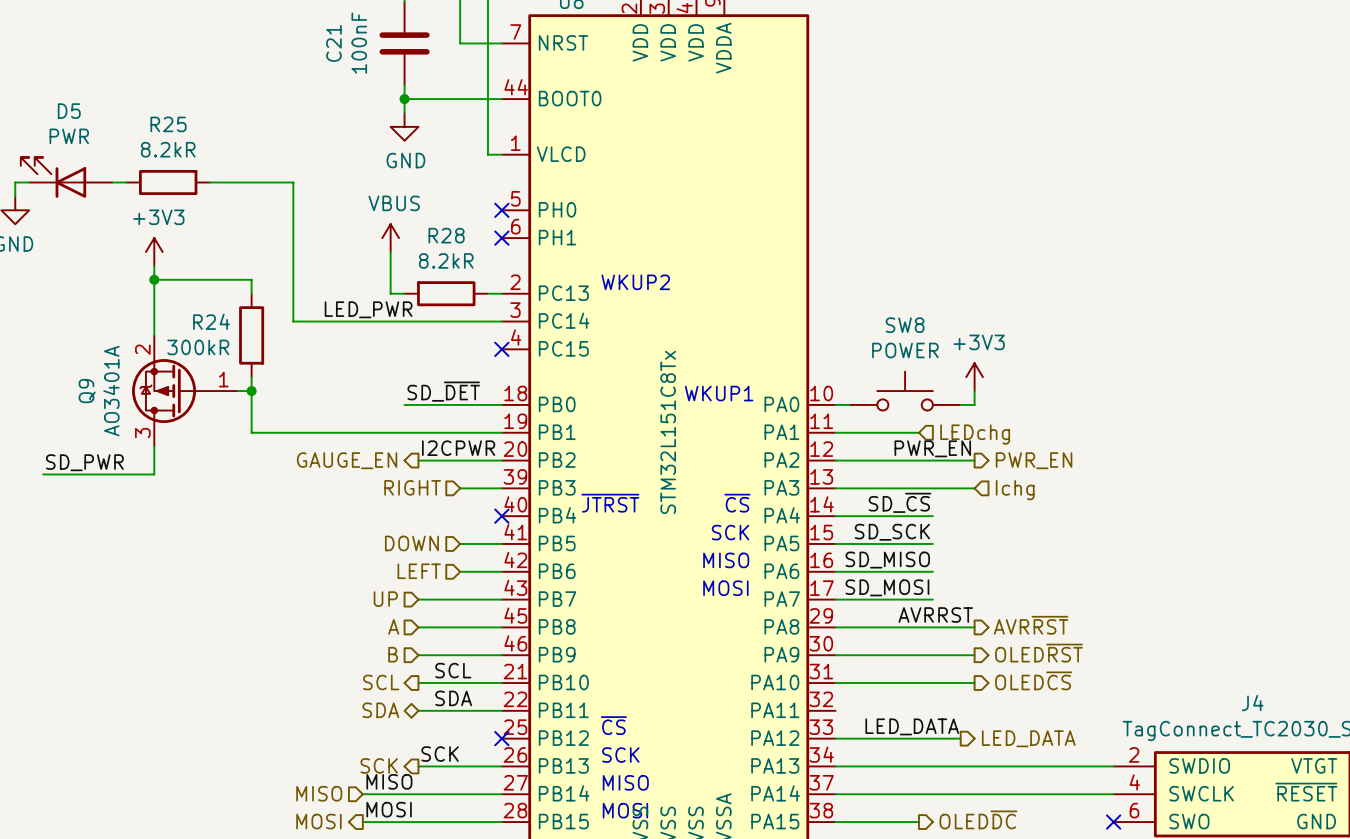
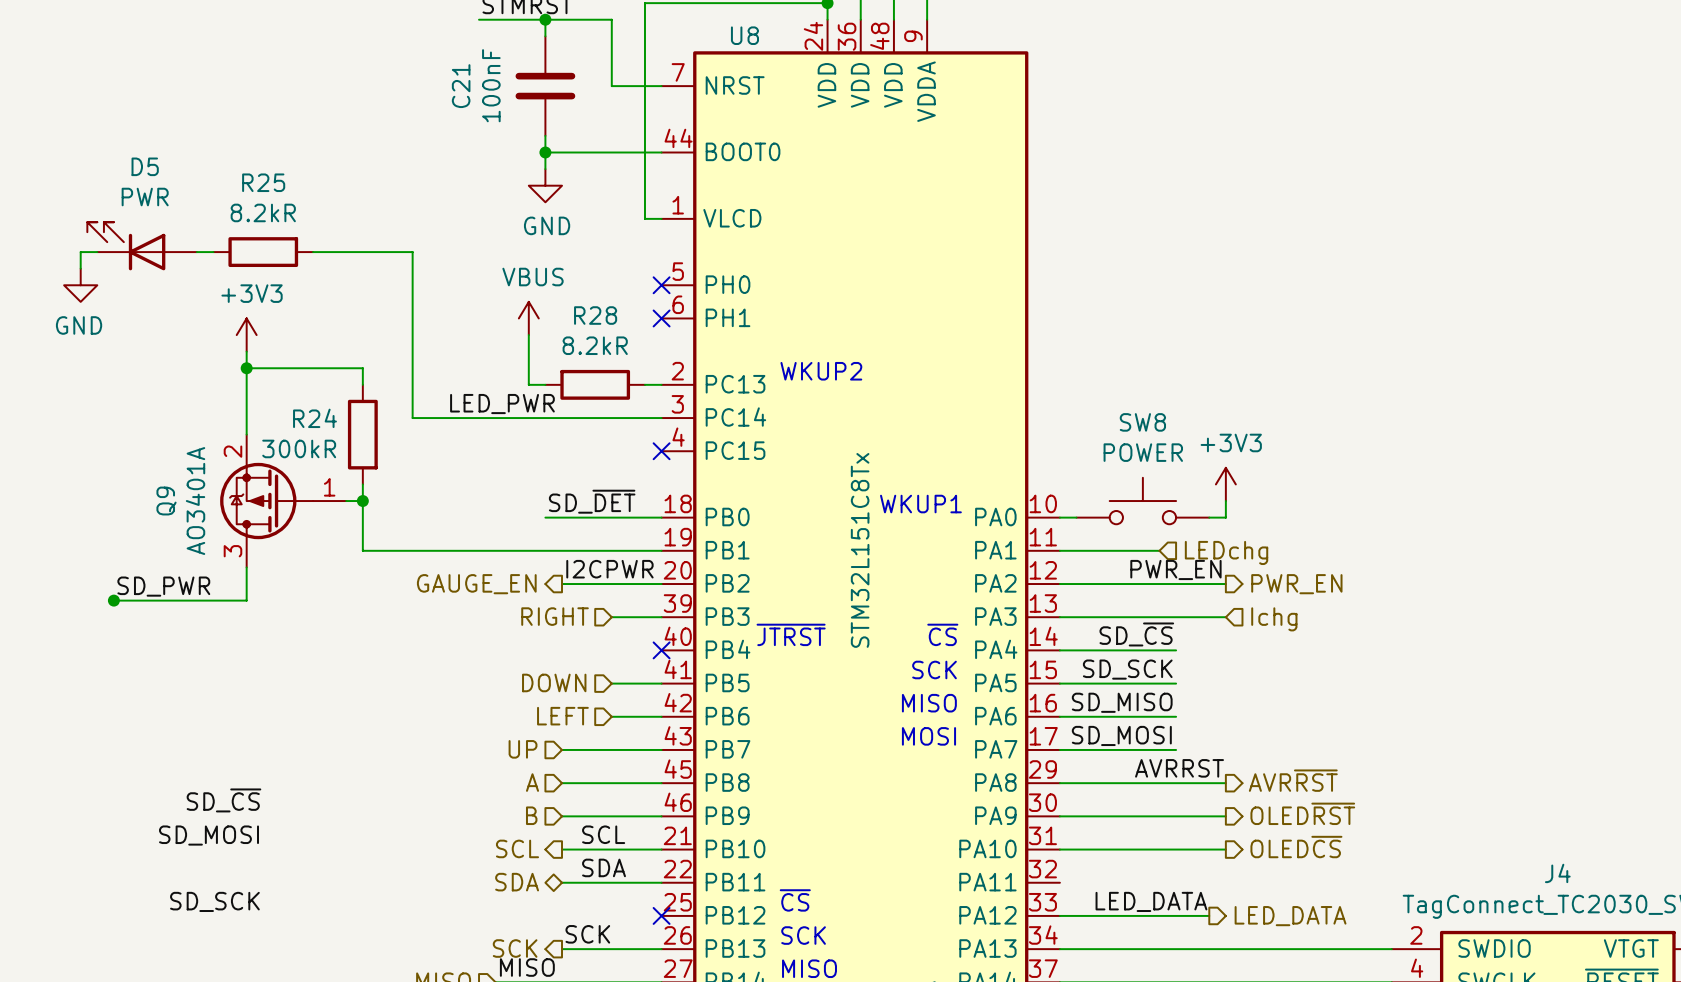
junction: none -> (113, 600)
label: none -> SD_~{CS} (223, 800)
label: none -> SD_MOSI (209, 835)
label: none -> SD_SCK (214, 901)

